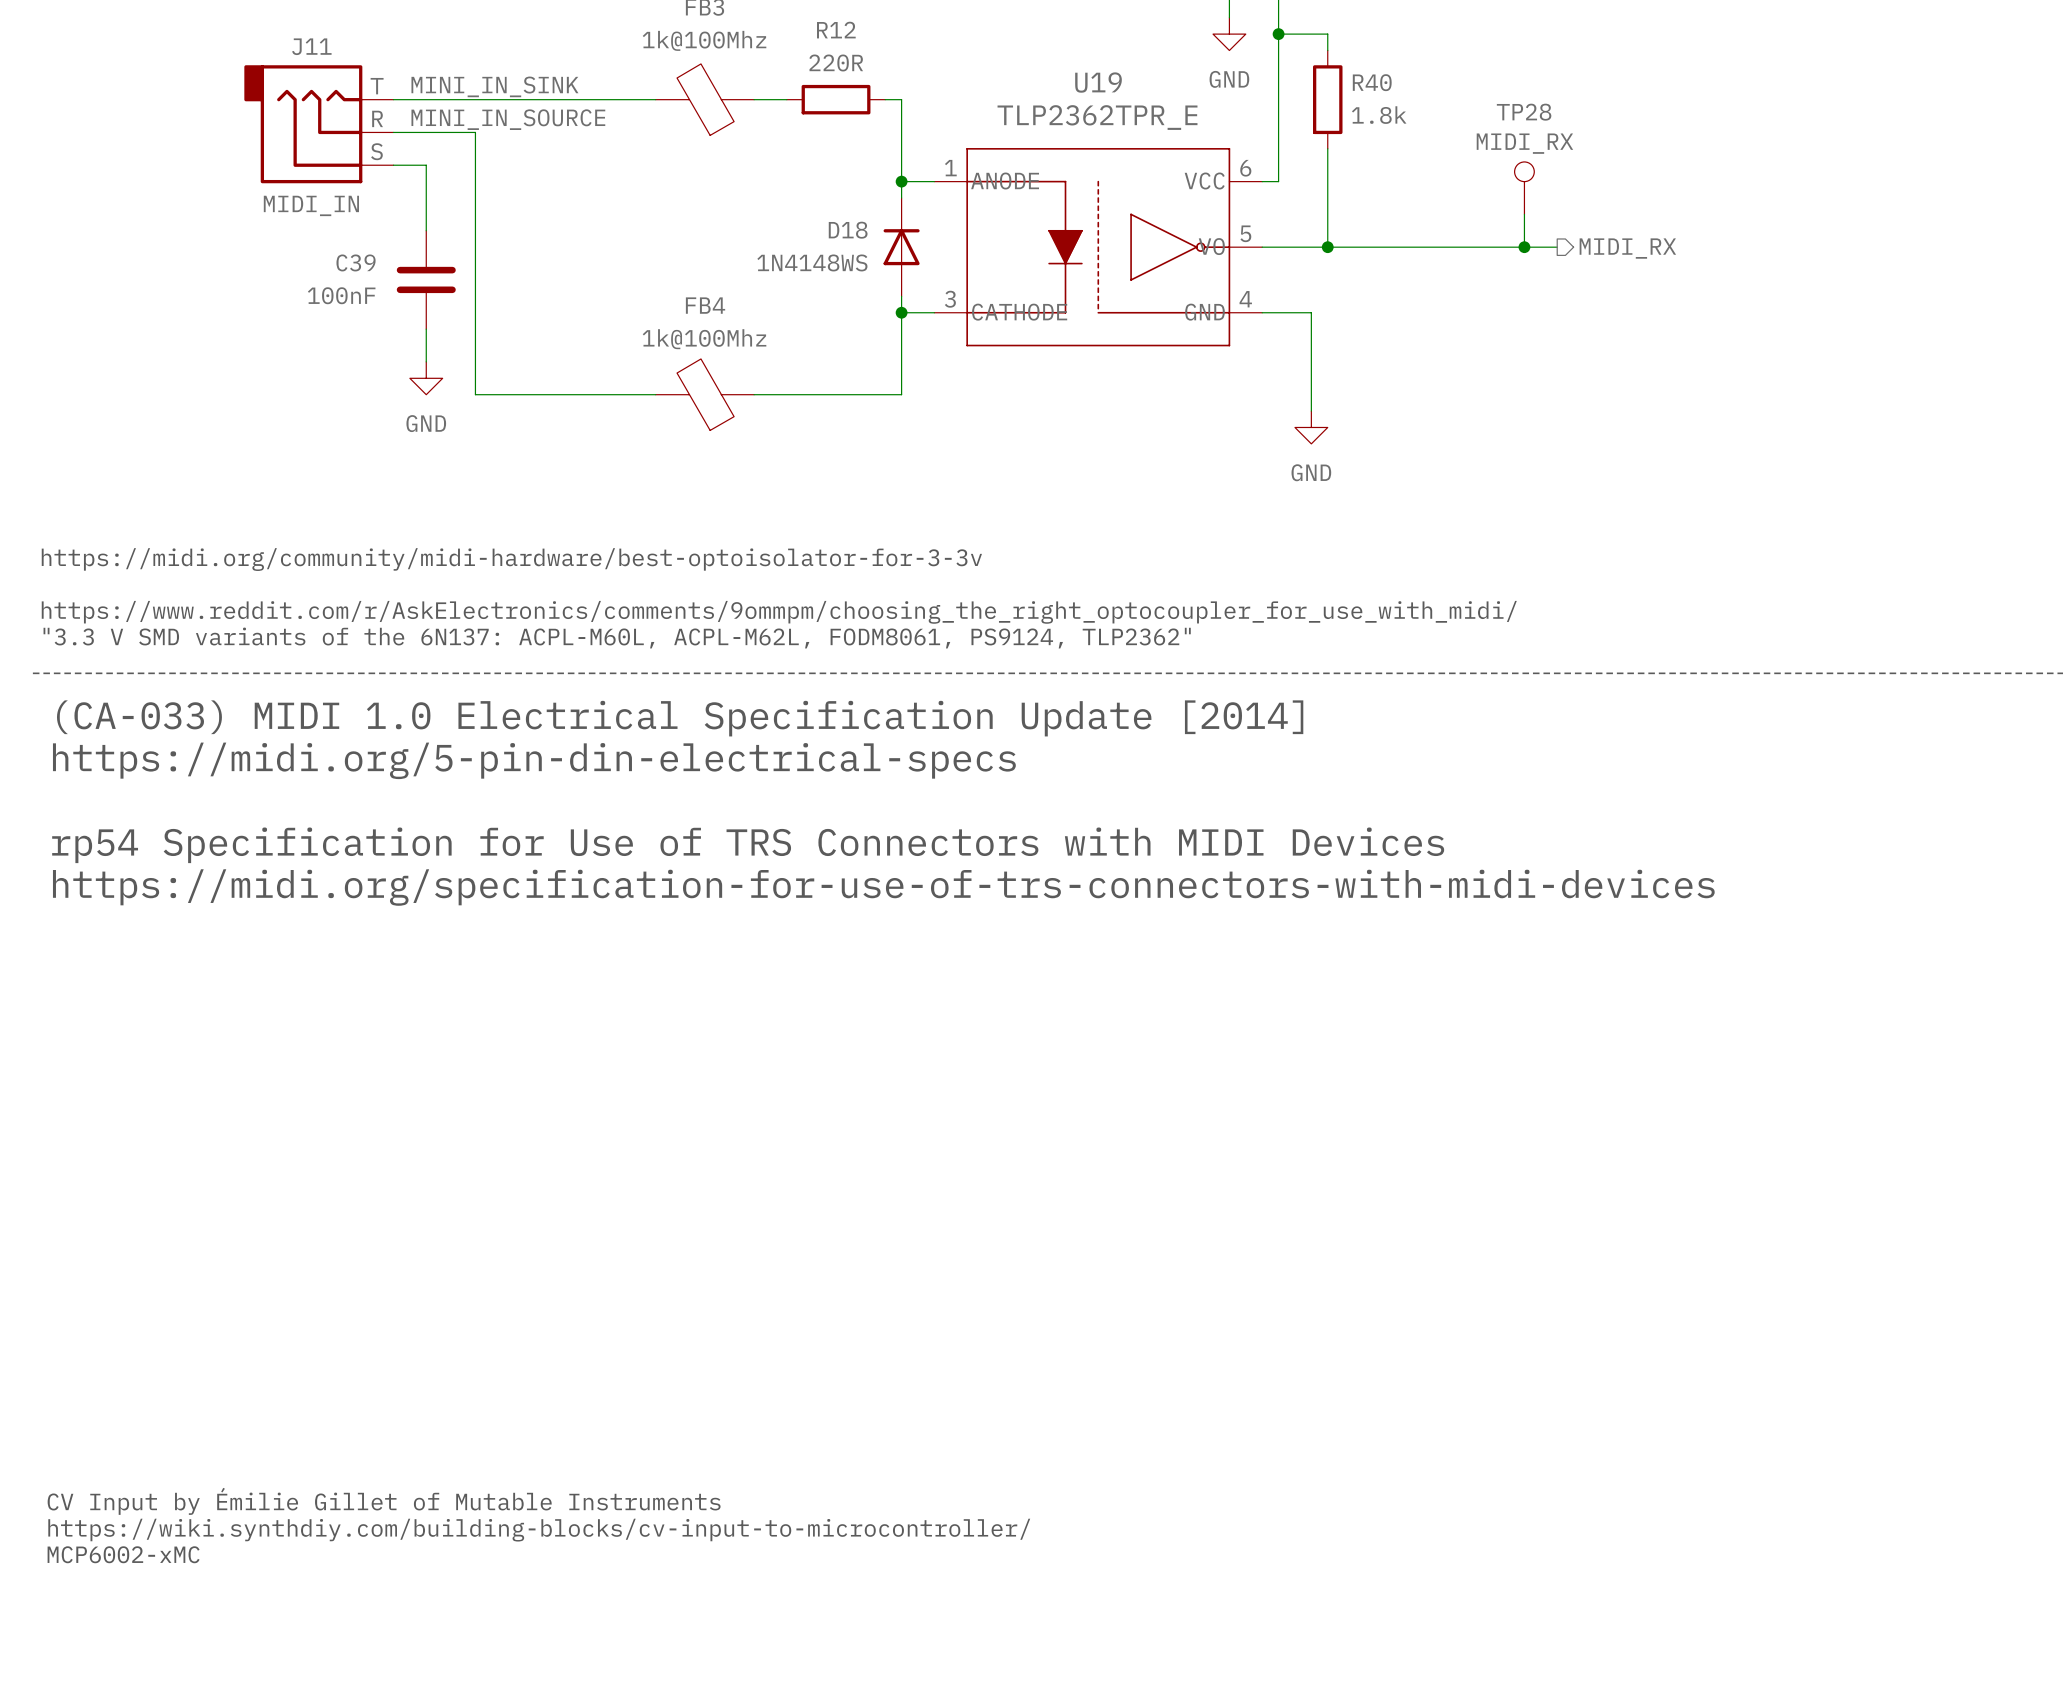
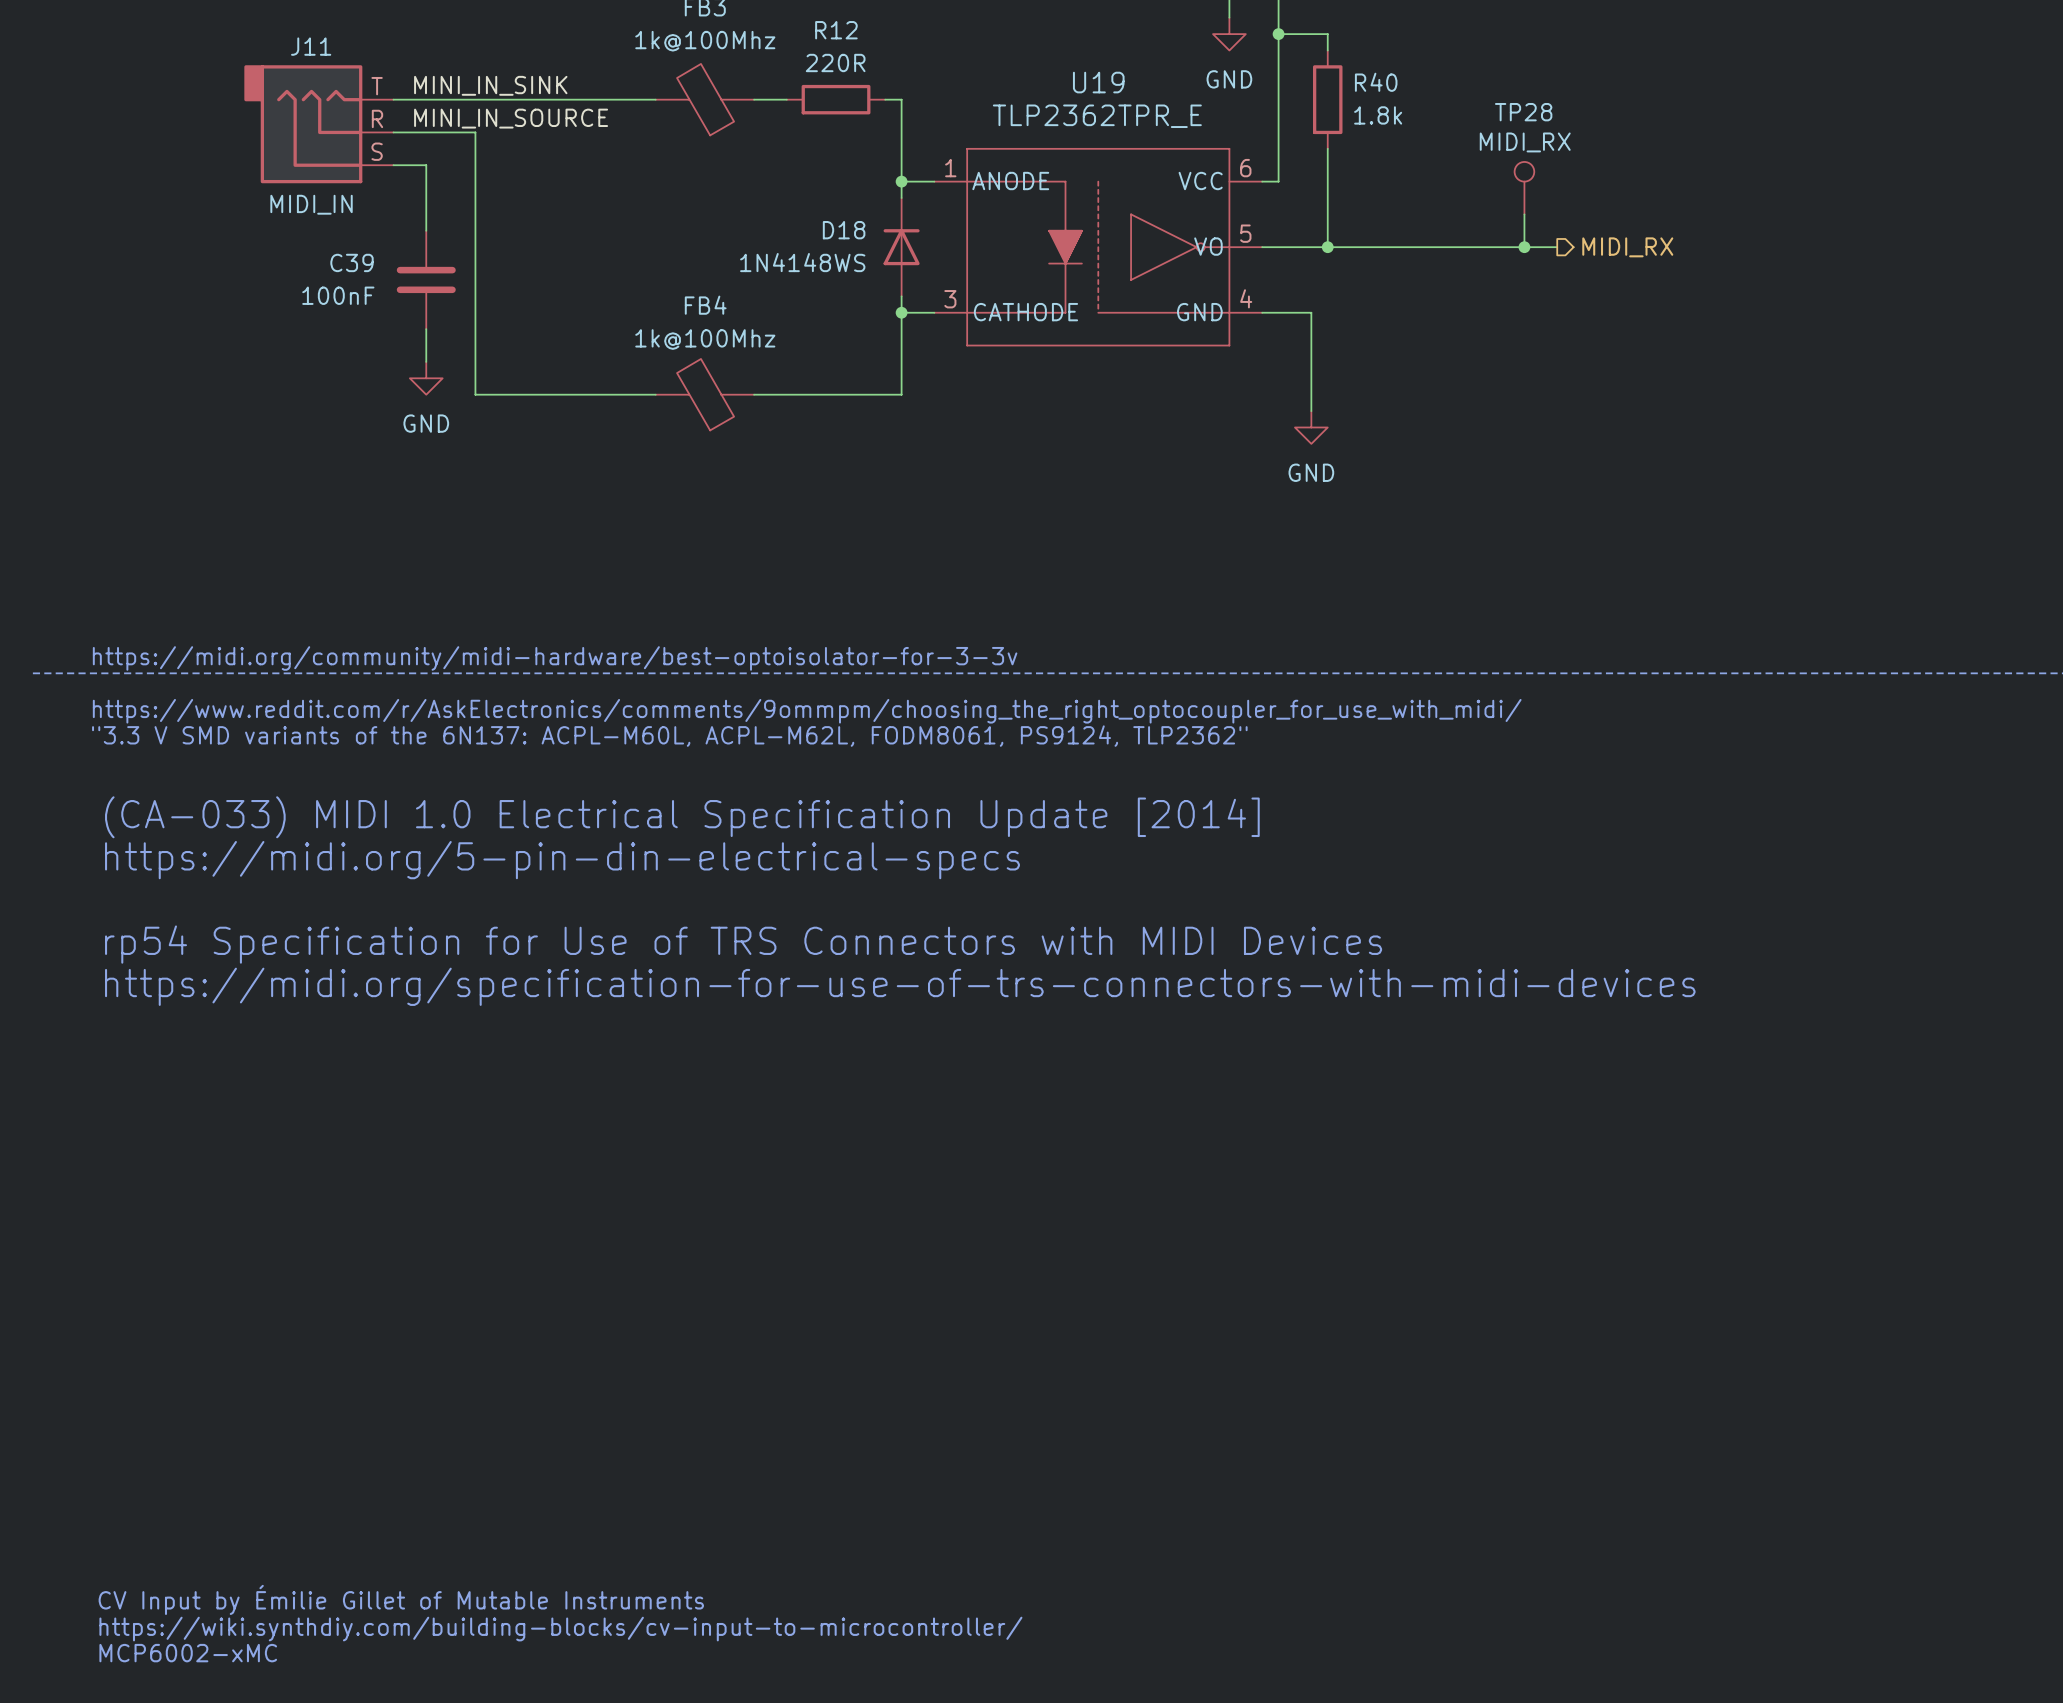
text position: https://midi.org/community/midi-hardware/best-optoisolator-for-3-3v (511, 559) -> https://midi.org/community/midi-hardware/best-optoisolator-for-3-3v (555, 658)
text position: https://www.reddit.com/r/AskElectronics/comments/9ommpm/choosing_the_right_optocoupler_for_use_with_midi/ (779, 612) -> https://www.reddit.com/r/AskElectronics/comments/9ommpm/choosing_the_right_optocoupler_for_use_with_midi/ (807, 711)
text position: "3.3 V SMD variants of the 6N137: ACPL-M60L, ACPL-M62L, FODM8061, PS9124, TLP2362" (617, 638) -> "3.3 V SMD variants of the 6N137: ACPL-M60L, ACPL-M62L, FODM8061, PS9124, TLP2362" (669, 736)
text position: (CA-033) MIDI 1.0 Electrical Specification Update [2014] (680, 718) -> (CA-033) MIDI 1.0 Electrical Specification Update [2014] (682, 817)
text position: https://midi.org/5-pin-din-electrical-specs (534, 760) -> https://midi.org/5-pin-din-electrical-specs (562, 860)
text position: rp54 Specification for Use of TRS Connectors with MIDI Devices (748, 845) -> rp54 Specification for Use of TRS Connectors with MIDI Devices (743, 944)
text position: https://midi.org/specification-for-use-of-trs-connectors-with-midi-devices (883, 887) -> https://midi.org/specification-for-use-of-trs-connectors-with-midi-devices (900, 986)
text position: CV Input by Émilie Gillet of Mutable Instruments (384, 1501) -> CV Input by Émilie Gillet of Mutable Instruments (401, 1599)
text position: https://wiki.synthdiy.com/building-blocks/cv-input-to-microcontroller/ (539, 1530) -> https://wiki.synthdiy.com/building-blocks/cv-input-to-microcontroller/ (560, 1629)
text position: MCP6002-xMC (123, 1554) -> MCP6002-xMC (188, 1653)

